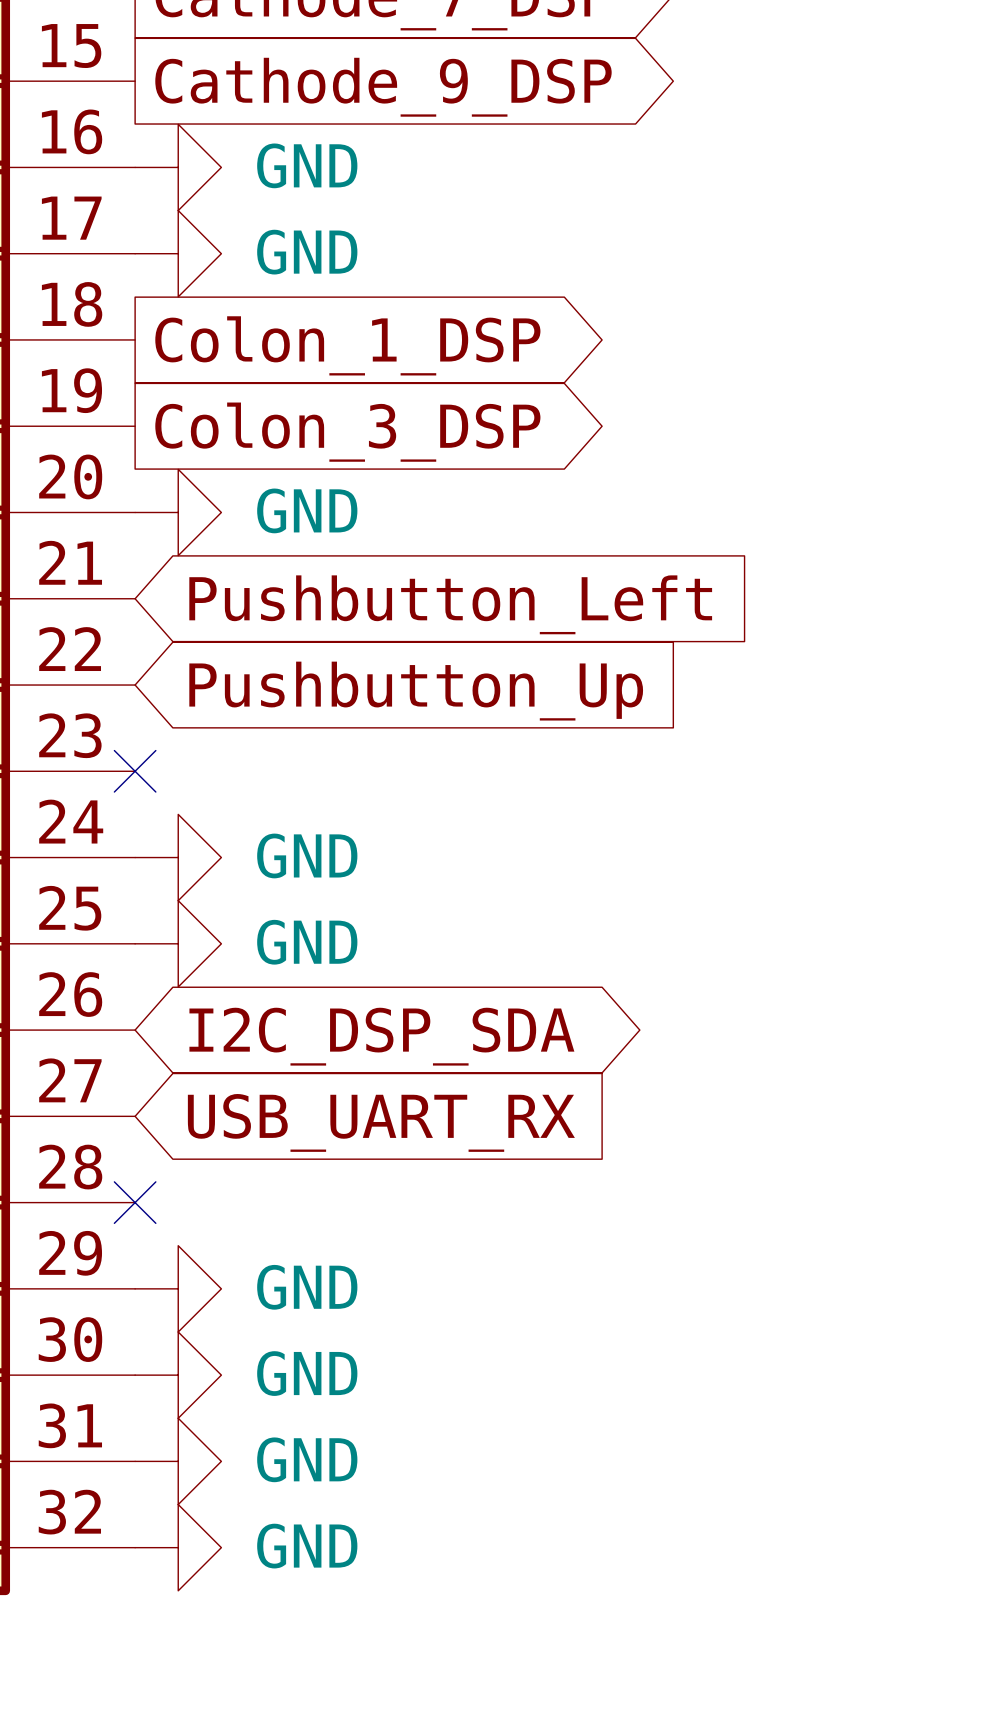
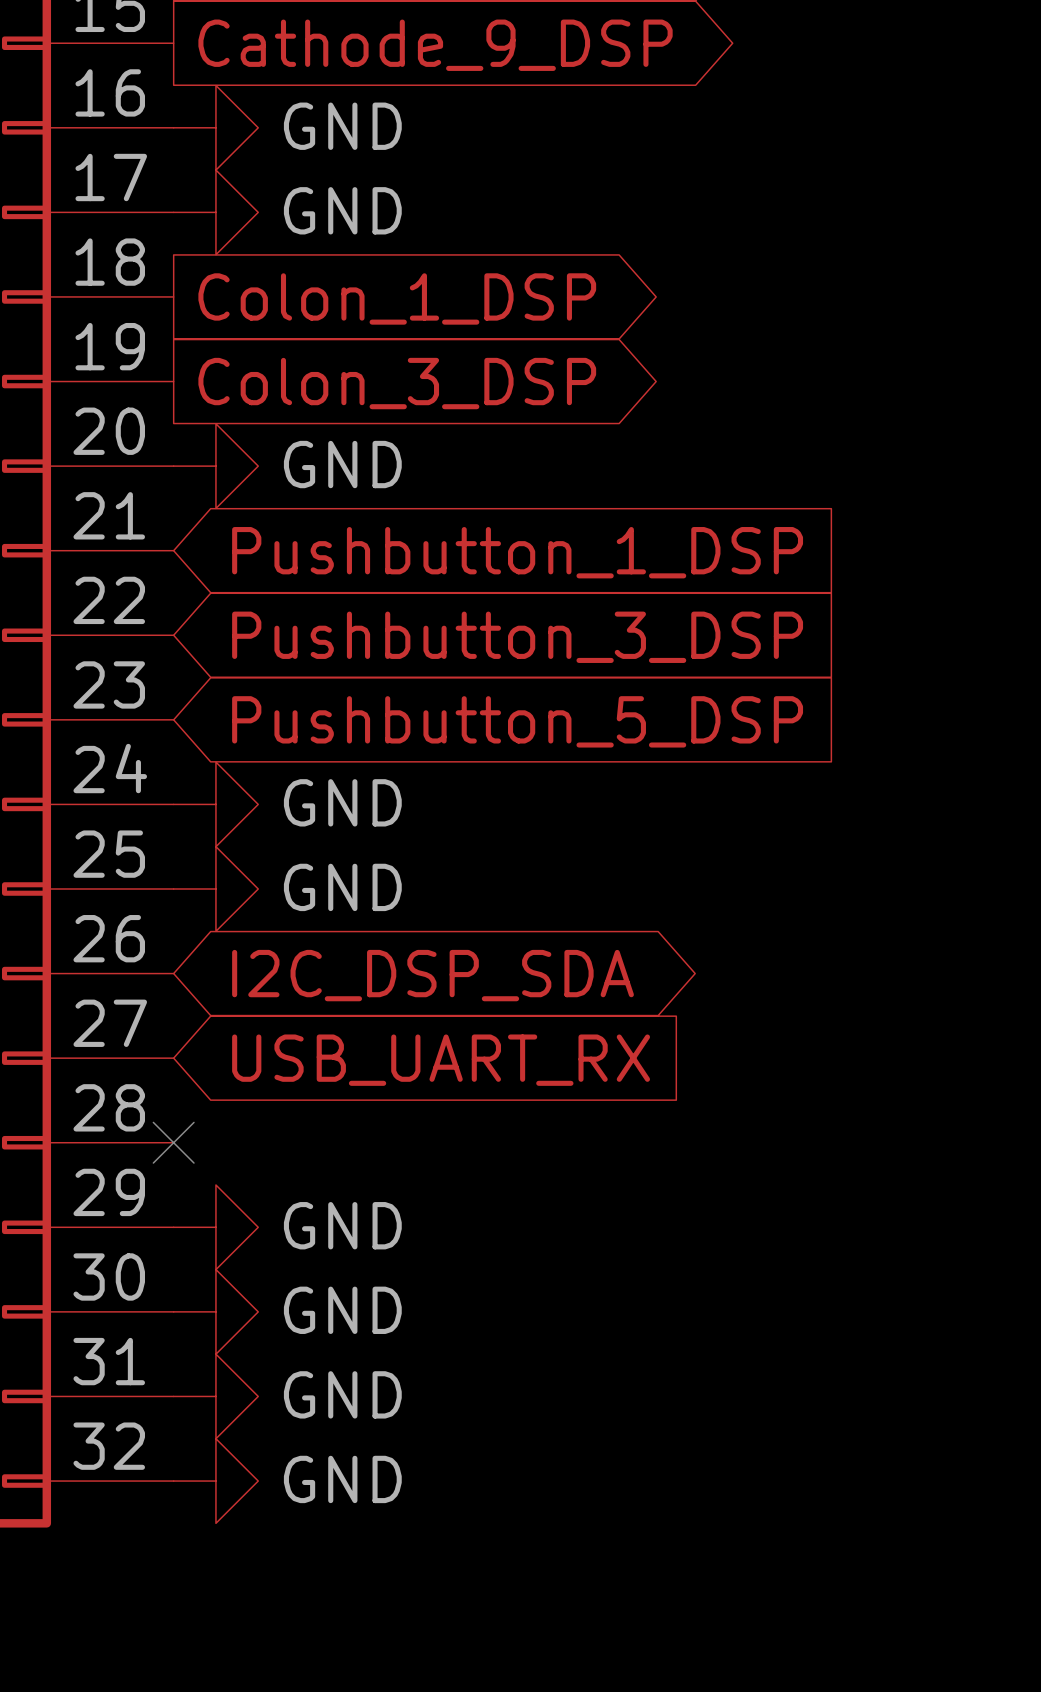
global label: Pushbutton_Left (450, 604) -> Pushbutton_1_DSP (517, 552)
global label: Pushbutton_Up (416, 691) -> Pushbutton_3_DSP (517, 637)
no-connect mark: (135, 771) -> none
global label: none -> Pushbutton_5_DSP (517, 721)

